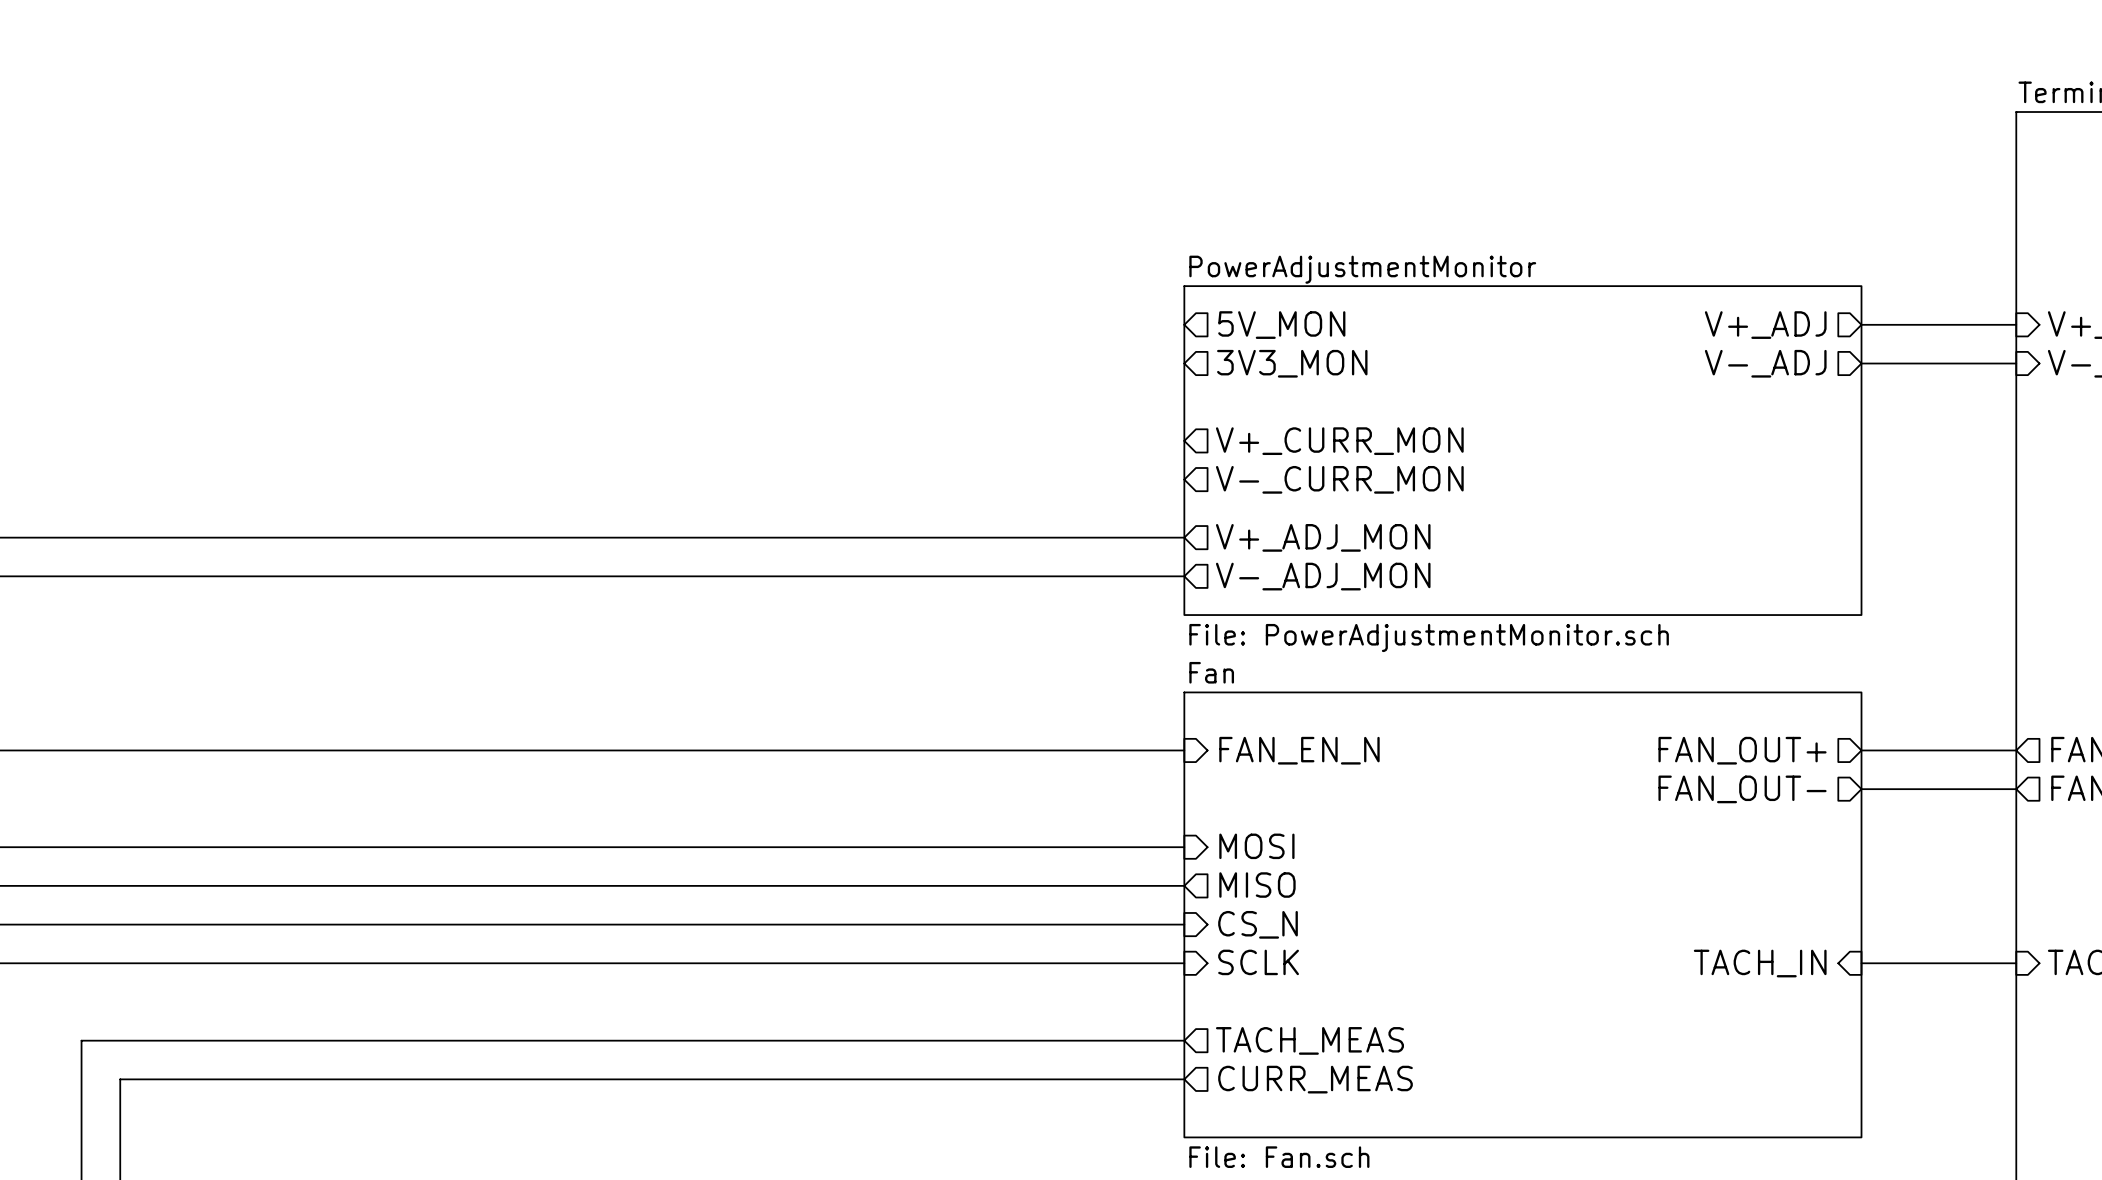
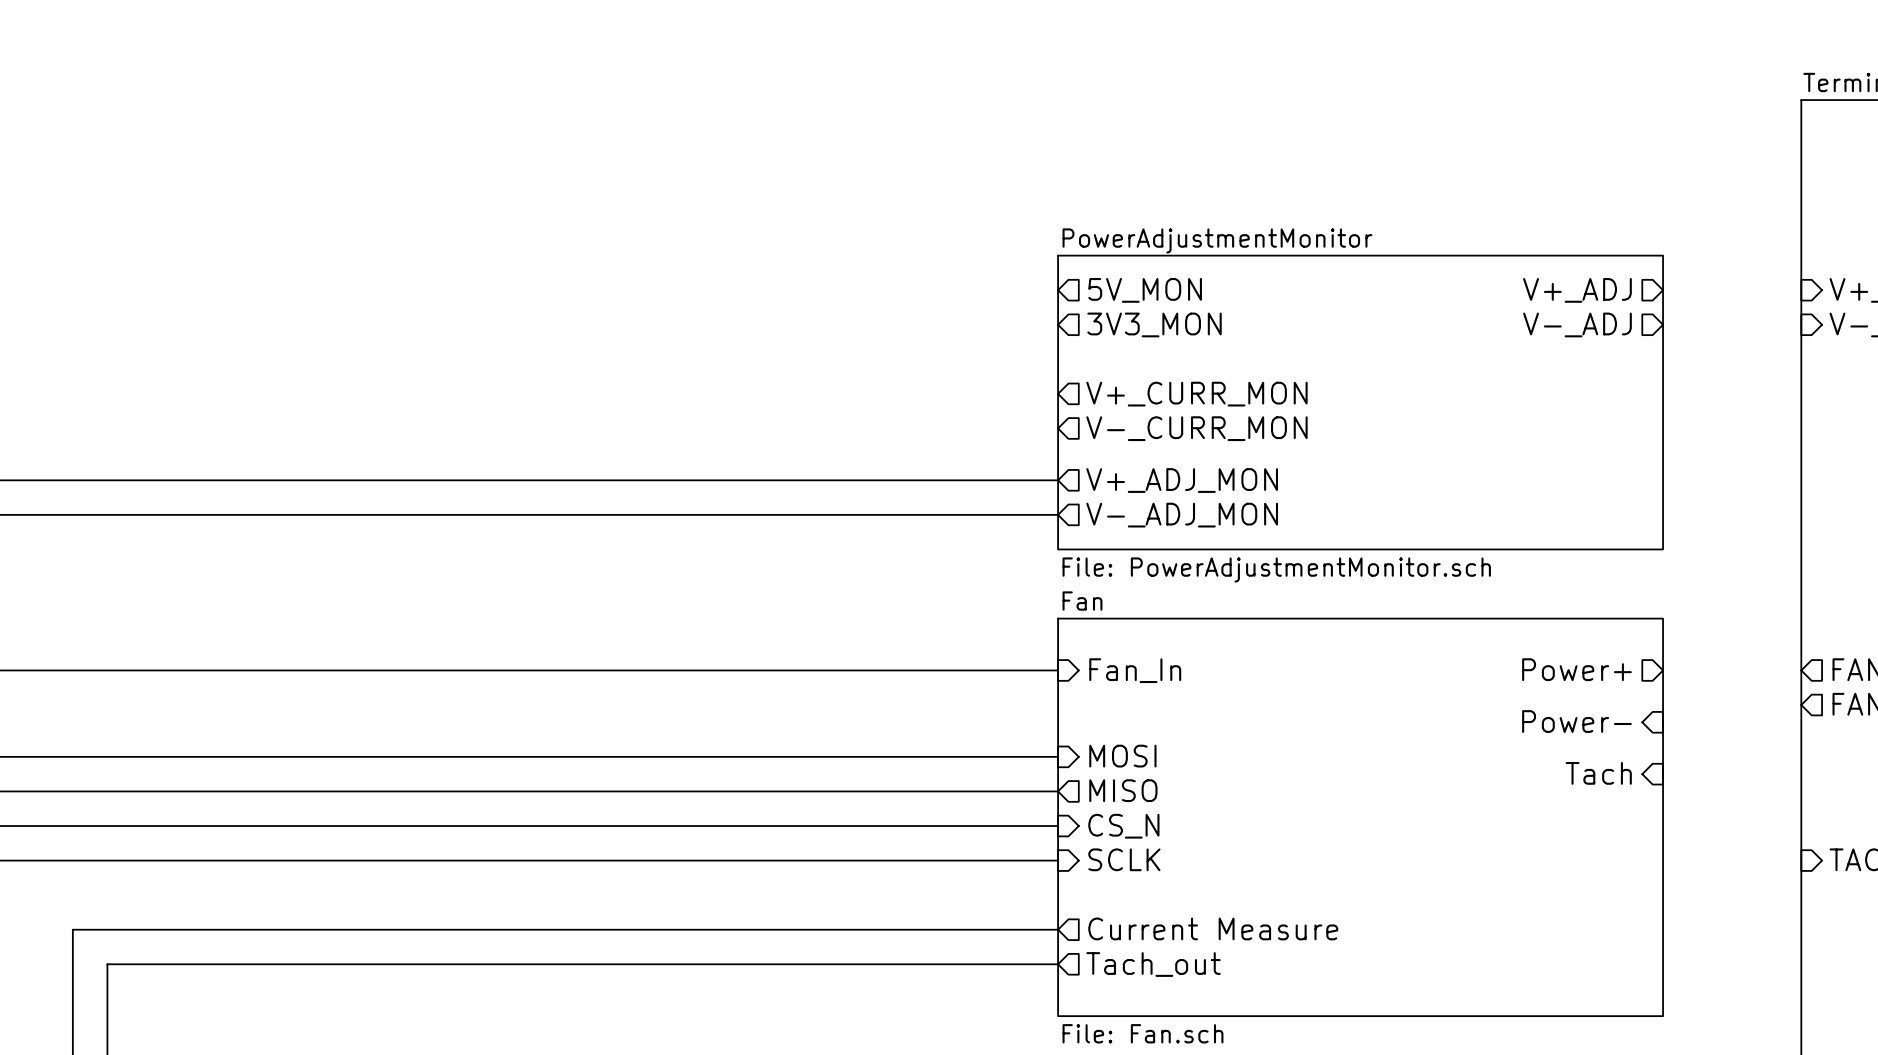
wire: (1861, 324) (2016, 324) -> none
wire: (1861, 363) (2016, 363) -> none
sheet pin: FAN_EN_N (1299, 750) -> Fan_In (1135, 670)
sheet pin: FAN_OUT+ (1742, 750) -> Power+ (1576, 669)
wire: (1861, 750) (2016, 750) -> none
sheet pin: FAN_OUT- (1742, 789) -> none
wire: (1861, 789) (2016, 789) -> none
sheet pin: none -> Power- (1576, 721)
sheet pin: none -> Tach (1598, 773)
sheet pin: TACH_IN (1760, 963) -> none
wire: (1861, 963) (2016, 963) -> none
sheet pin: TACH_MEAS (1309, 1040) -> Current Measure (1213, 928)
sheet pin: CURR_MEAS (1315, 1079) -> Tach_out (1153, 964)

